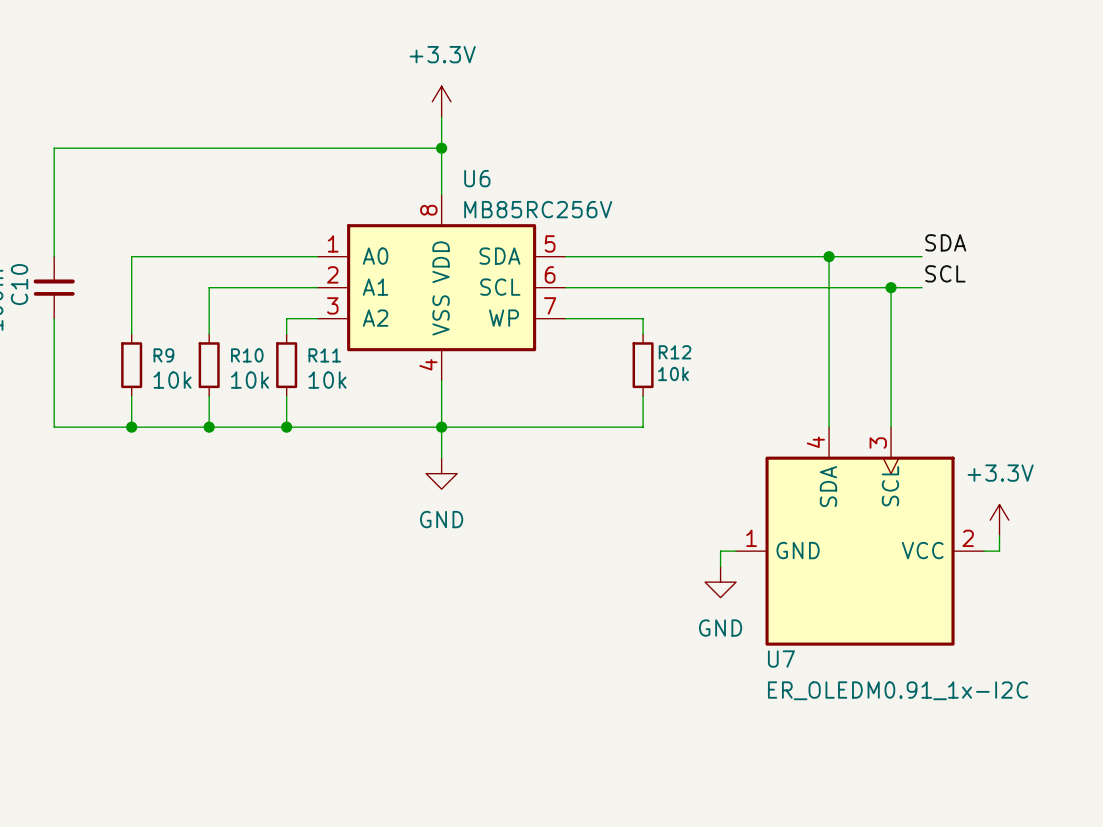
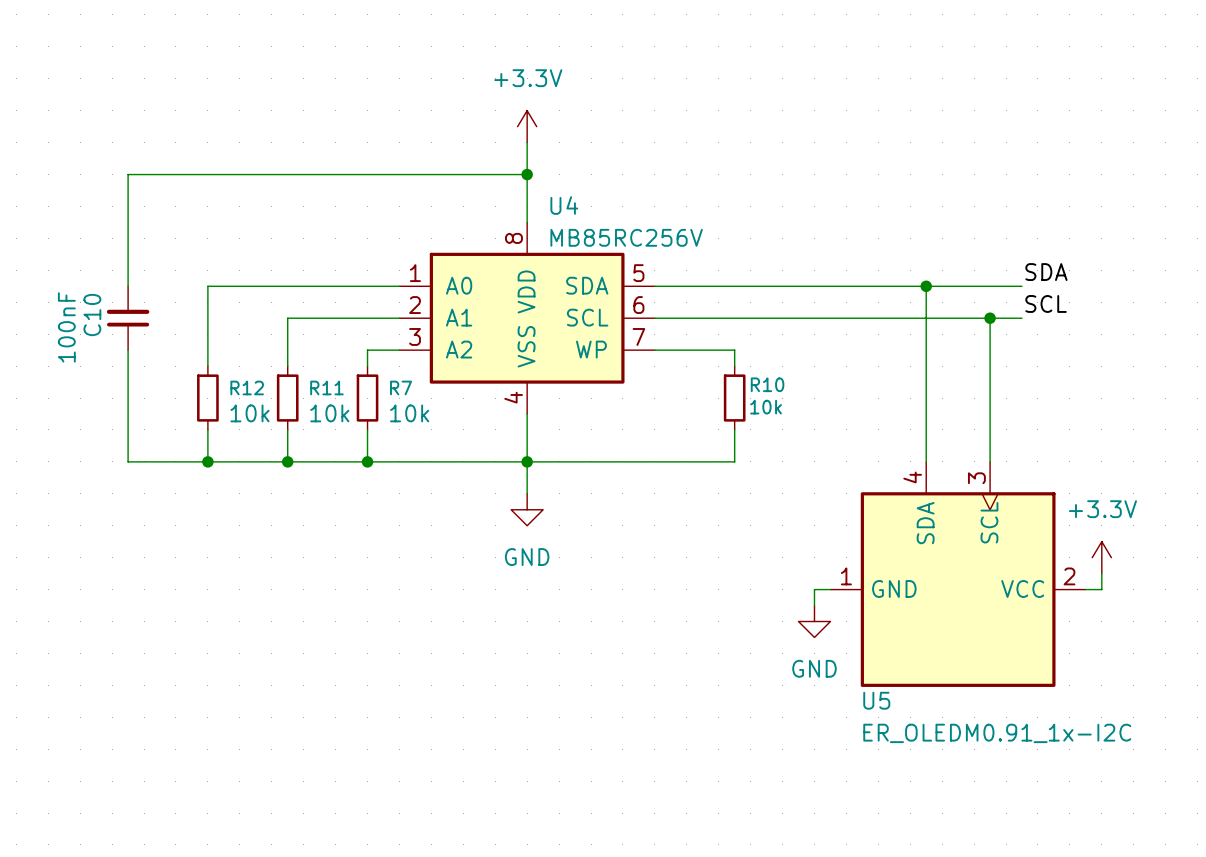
U6 name: U6 (477, 178) -> U4 (564, 205)
R12 name: R12 (675, 352) -> R10 (767, 384)
R9 name: R9 (163, 355) -> R12 (247, 387)
R10 name: R10 (247, 355) -> R11 (326, 387)
R11 name: R11 (324, 355) -> R7 (401, 387)
U7 name: U7 (781, 659) -> U5 (876, 700)

